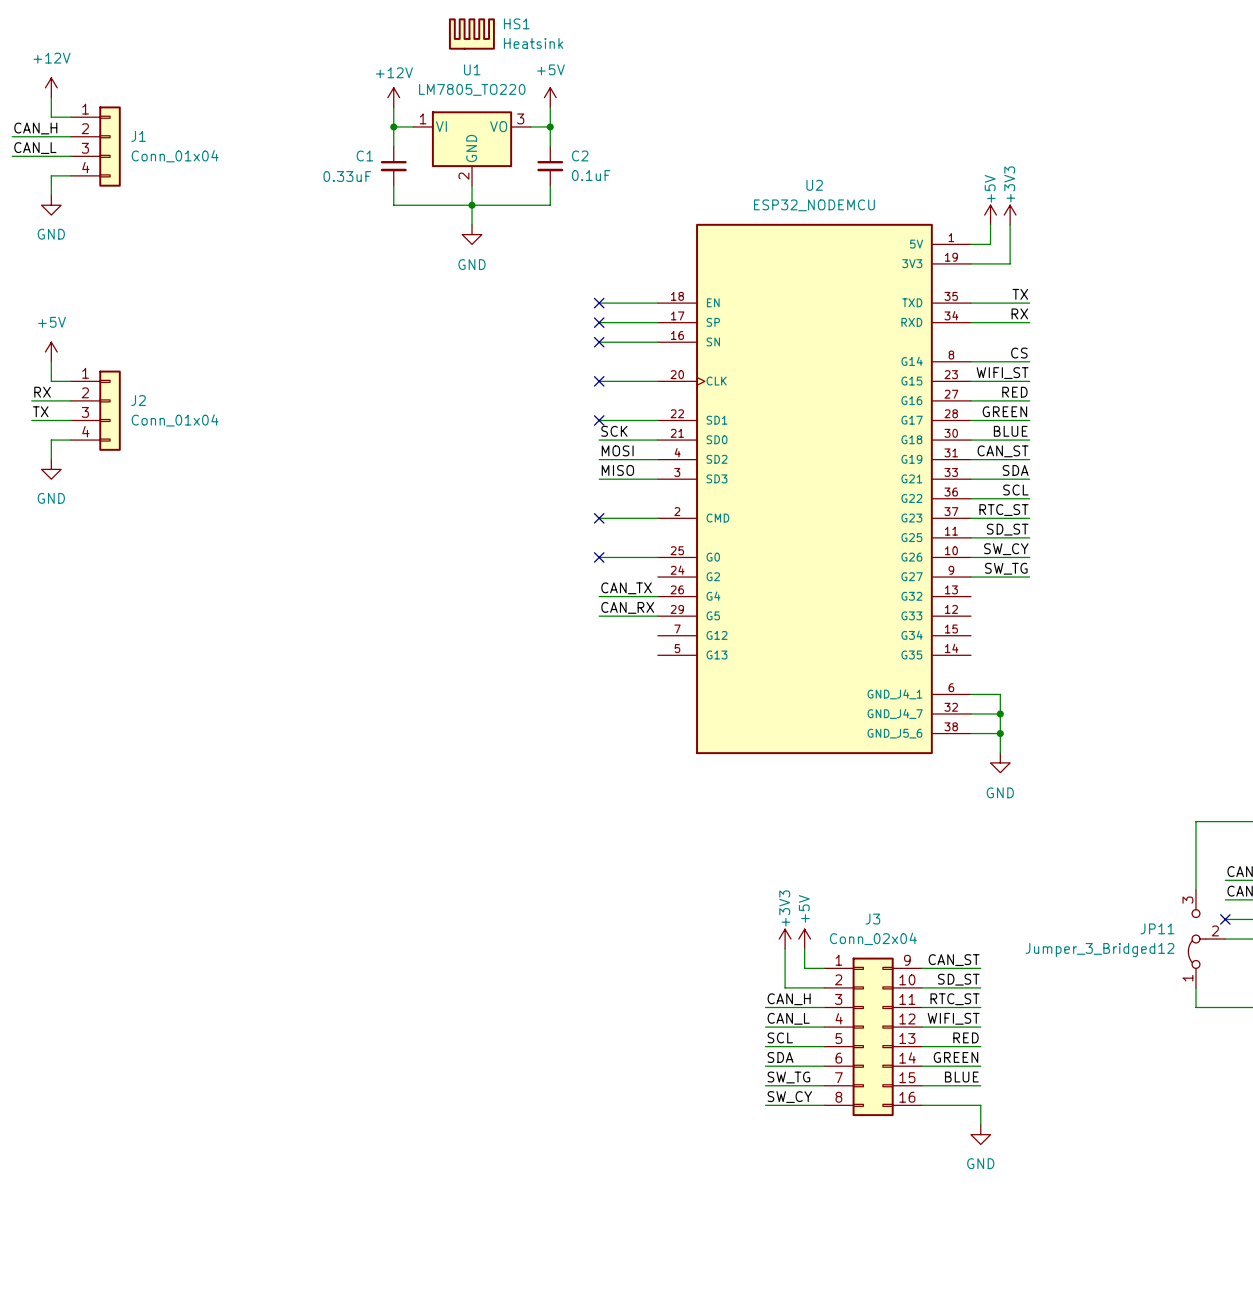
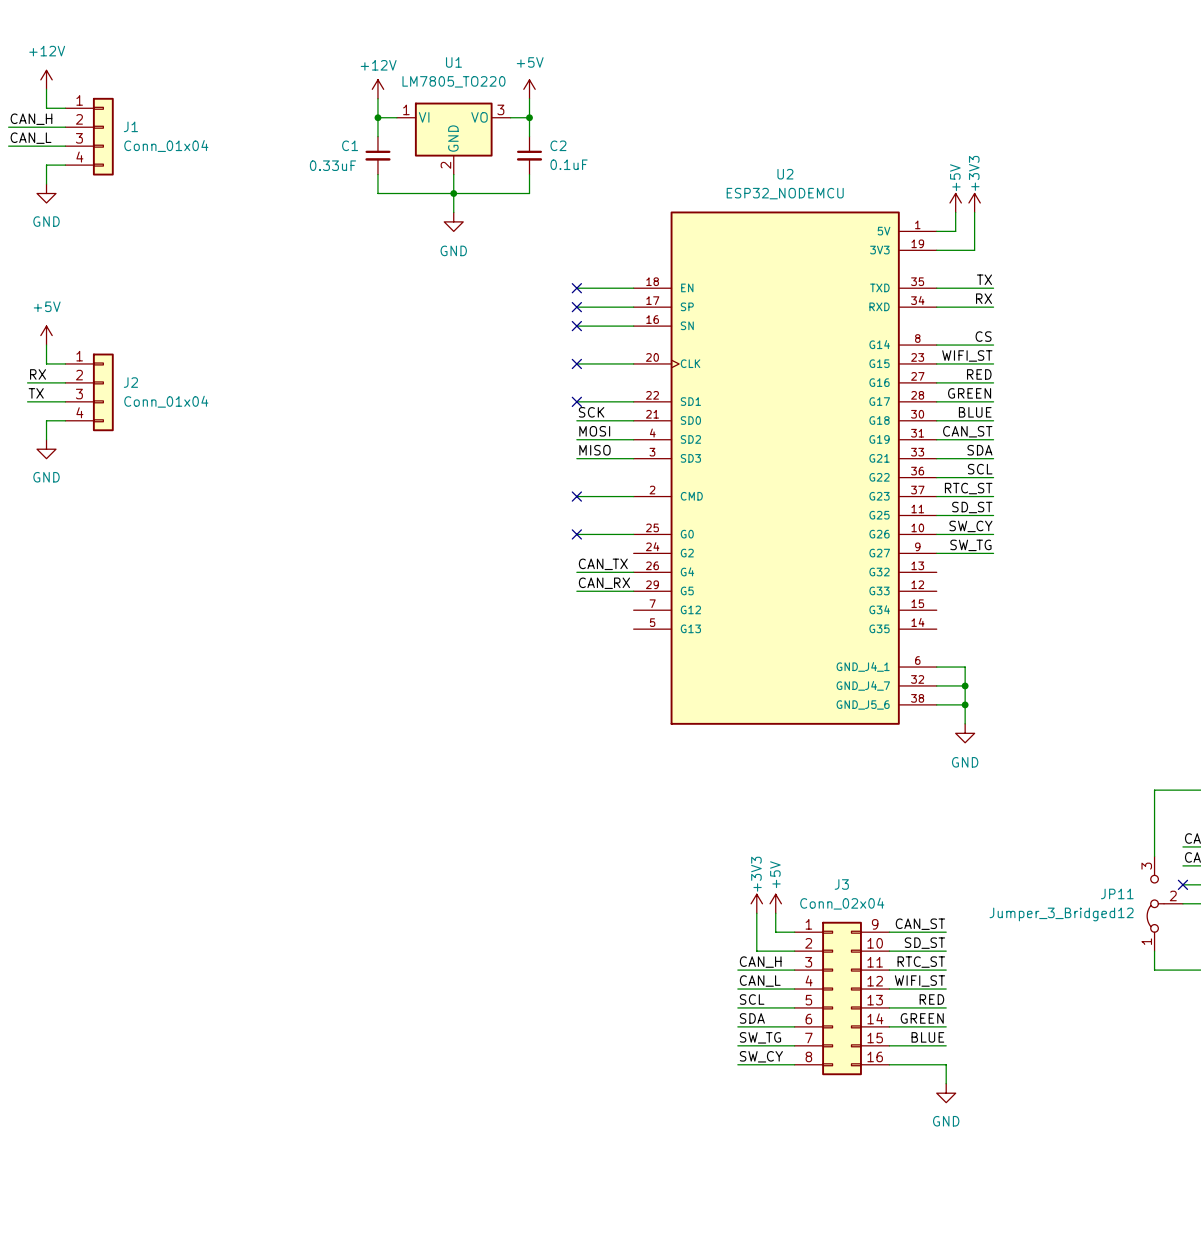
HS1: Heatsink (471, 34) -> none

